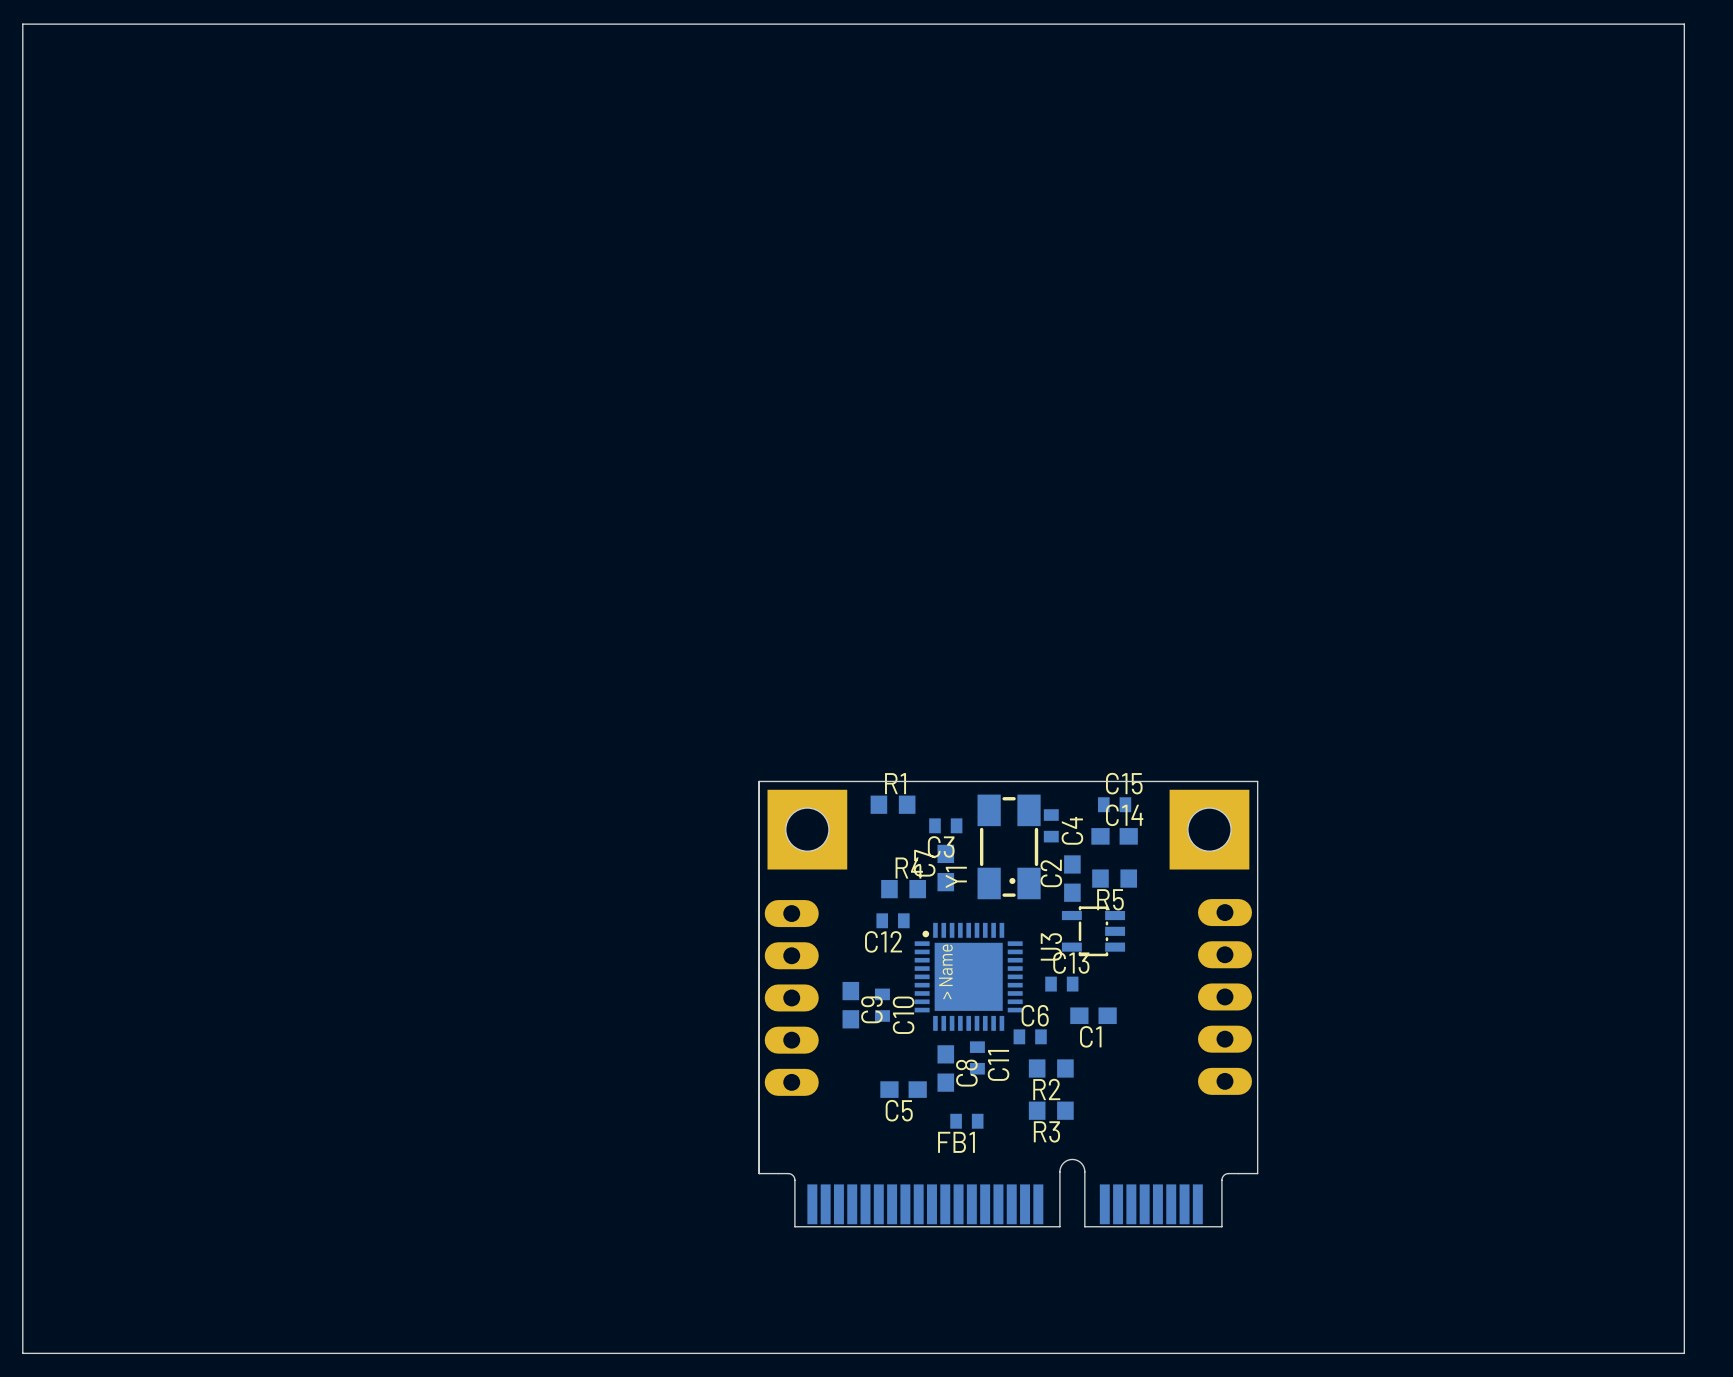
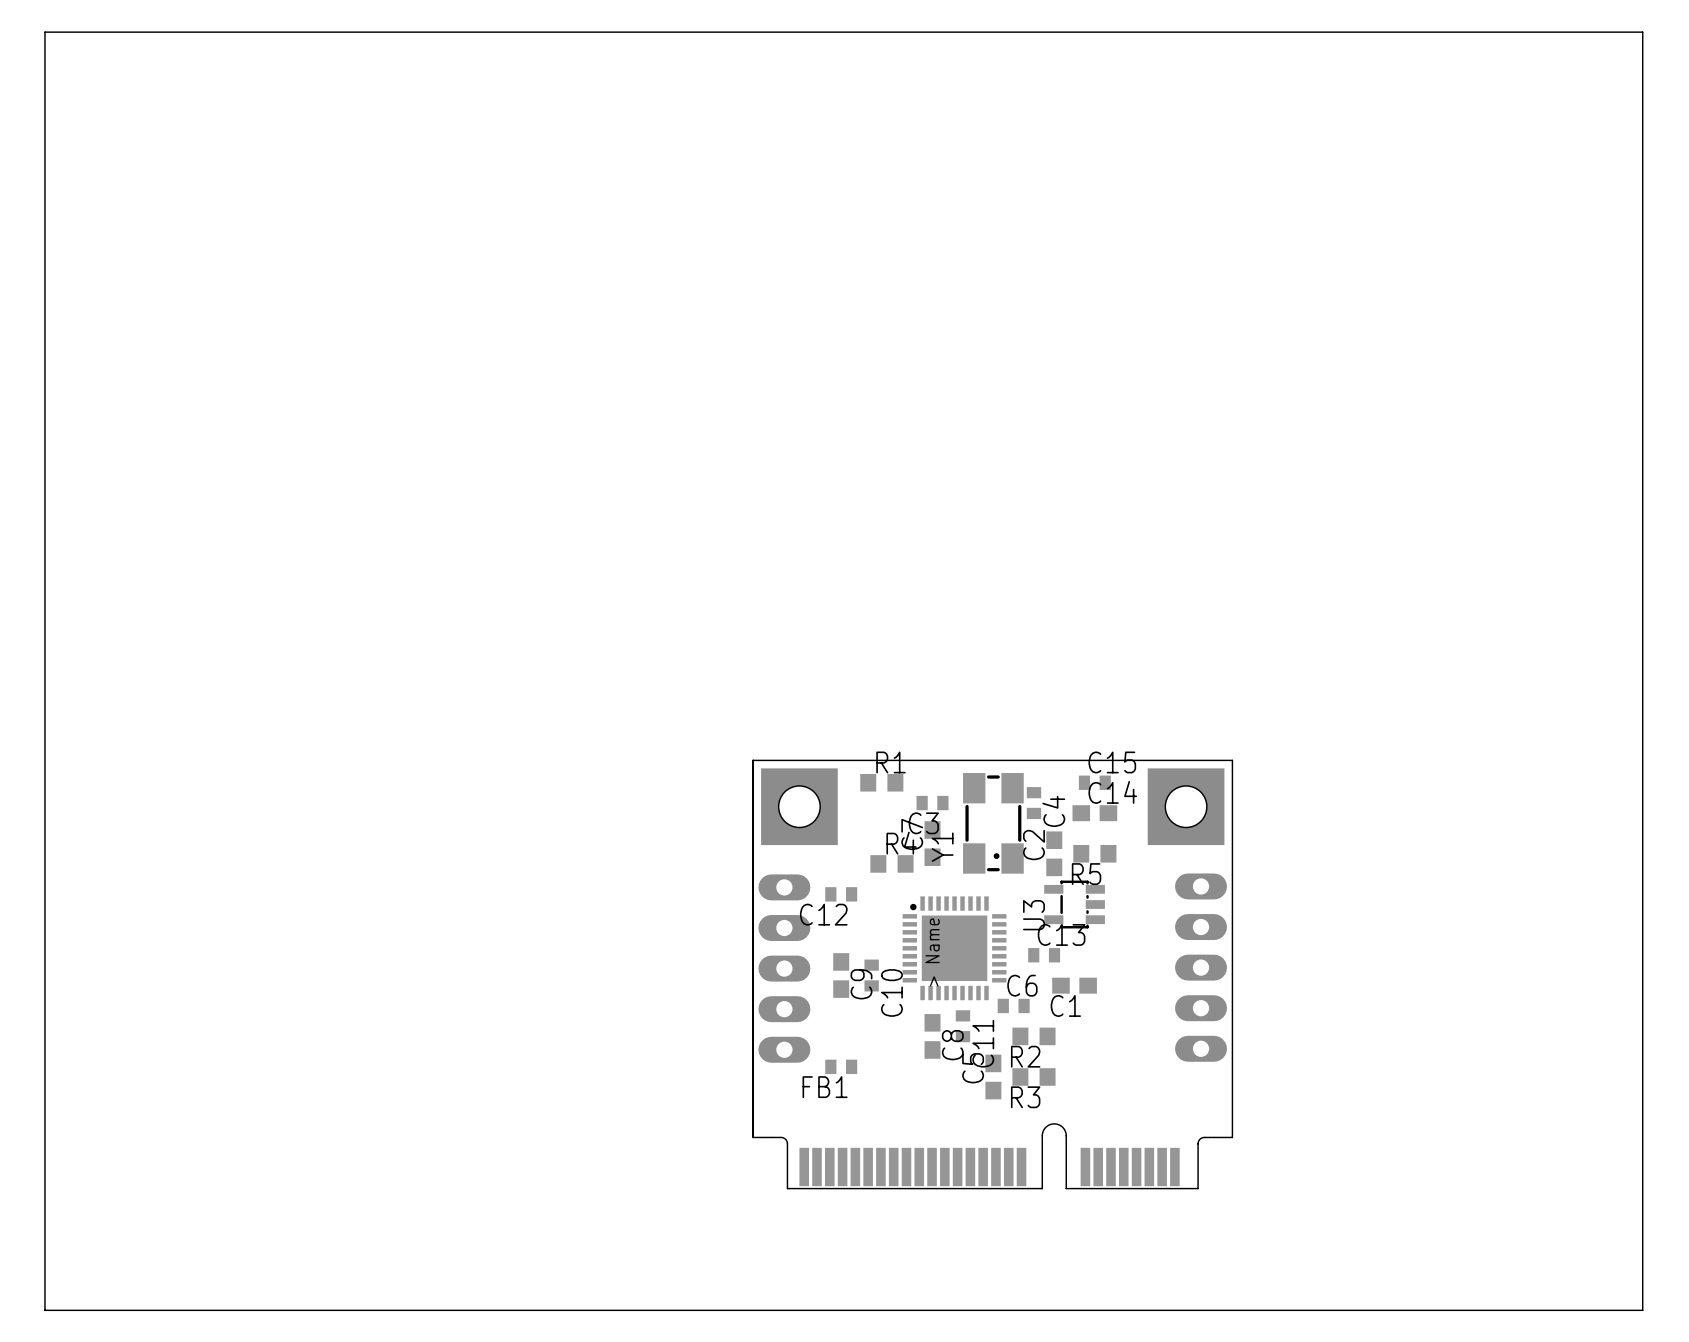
C12 position: (893, 920) -> (841, 894)
C5 rotation: 0° (903, 1089) -> 90° clockwise (993, 1076)
C5 position: (903, 1089) -> (993, 1076)
FB1 position: (966, 1121) -> (841, 1066)

